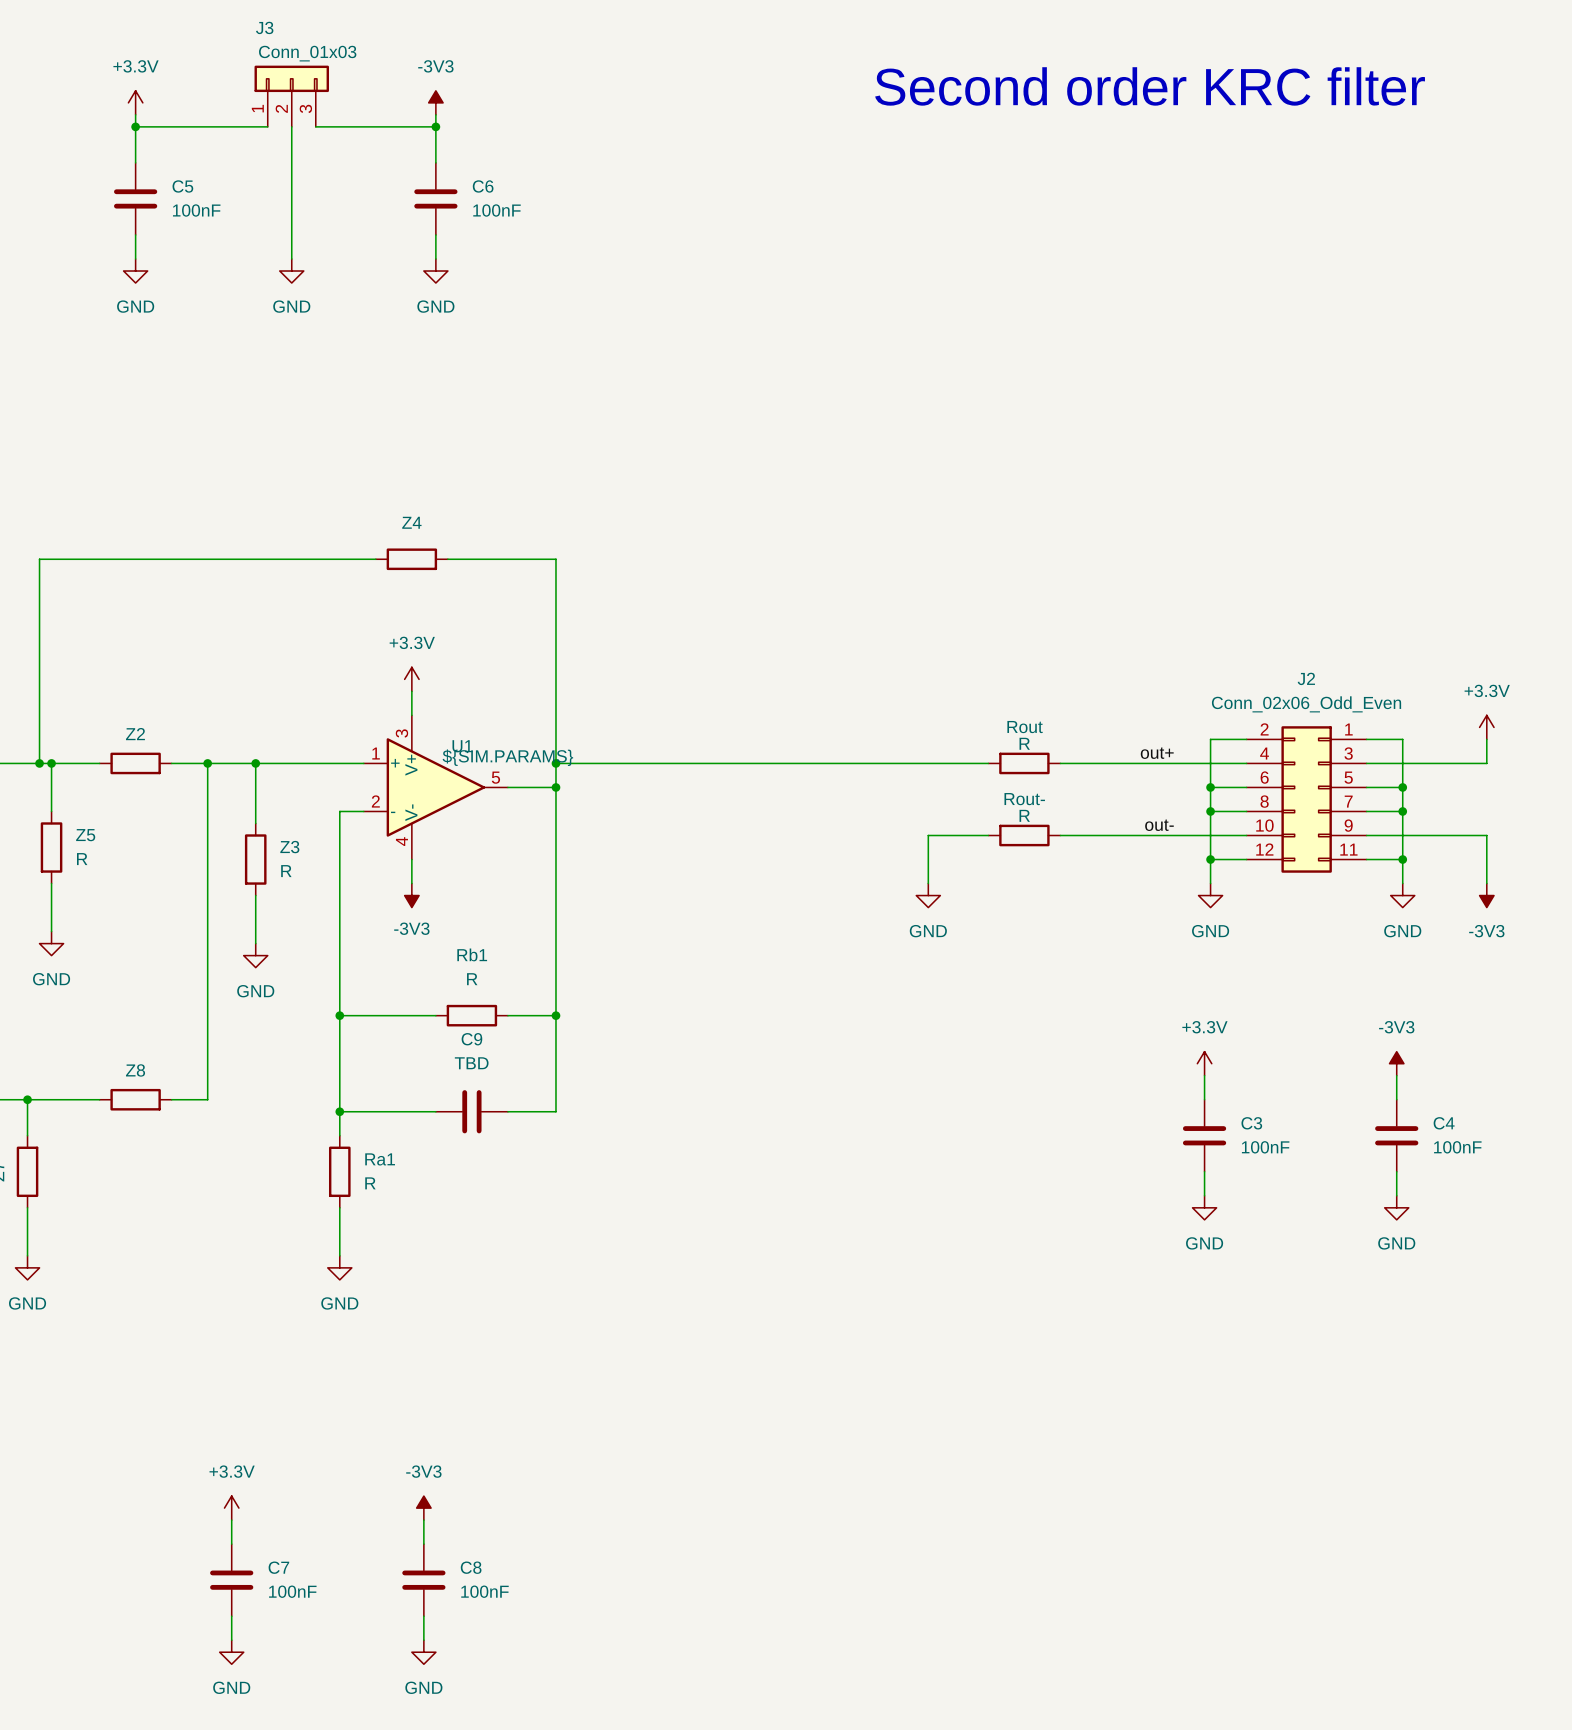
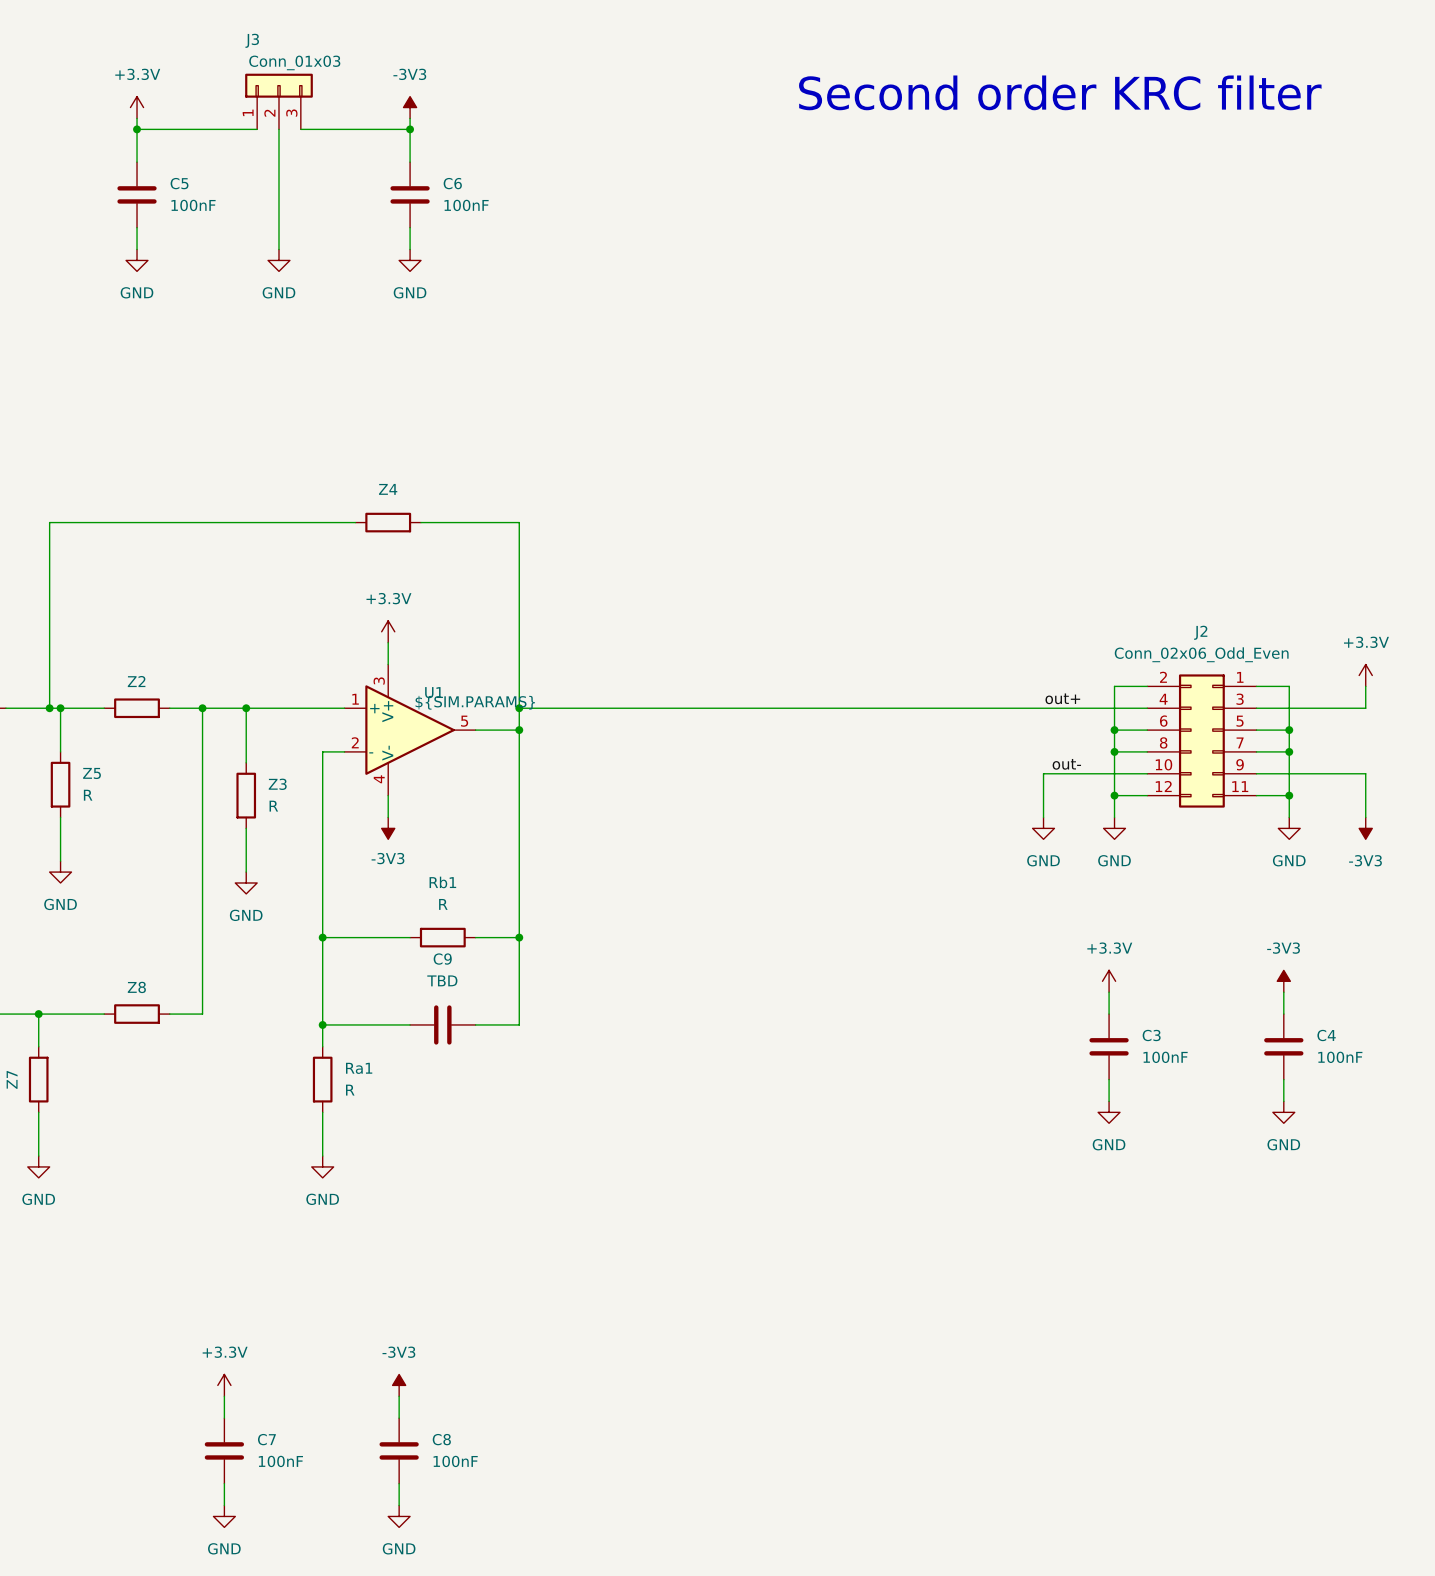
wire: none -> (912, 708) (977, 708)
Rout: R (1024, 763) -> none
wire: (988, 835) (928, 835) (928, 883) -> none
Rout-: R (1024, 835) -> none
wire: (1060, 835) (1132, 835) -> (1043, 817) (1043, 773)
power symbol position: GND (928, 895) -> GND (1043, 828)

